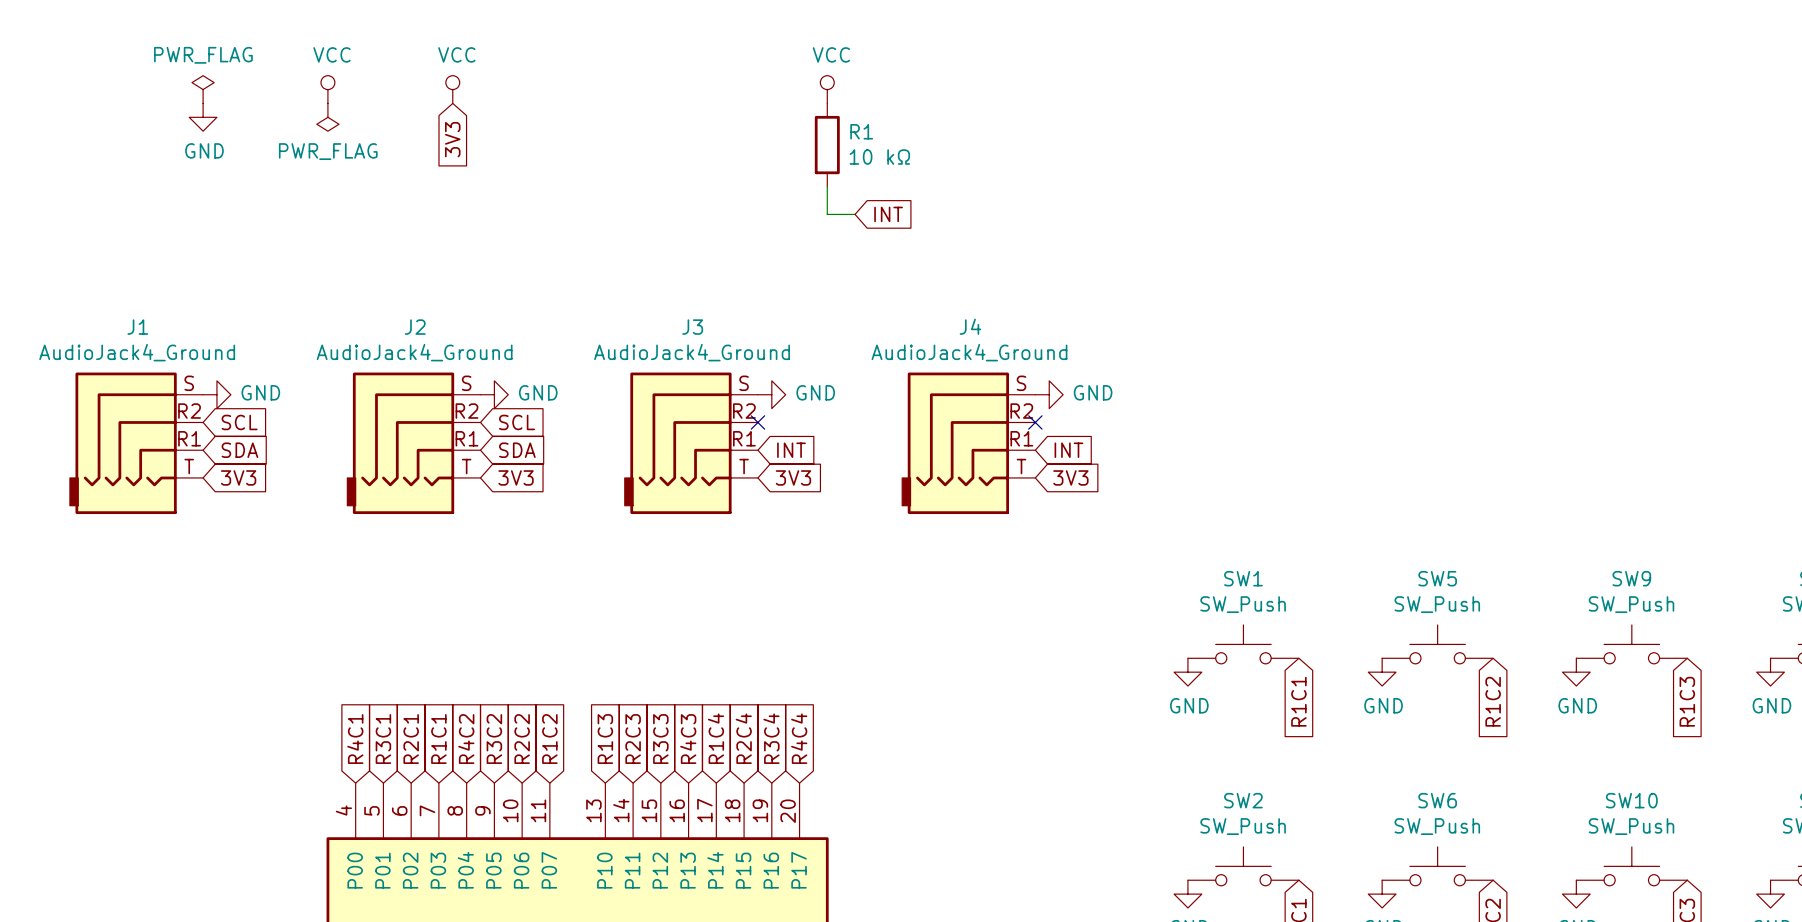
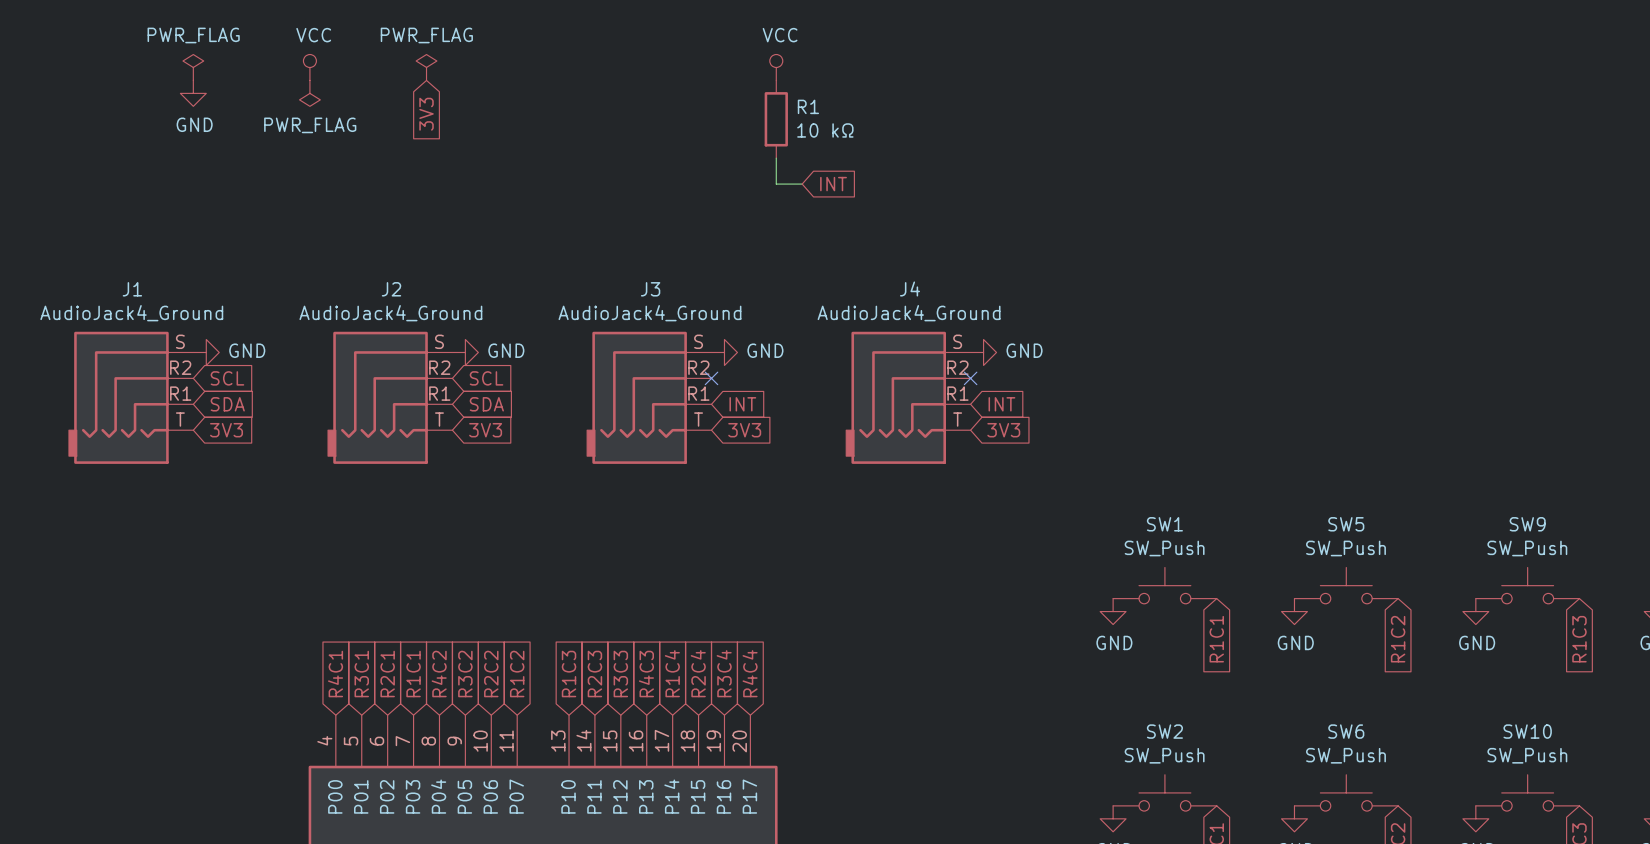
power symbol: VCC (452, 89) -> PWR_FLAG (426, 67)

